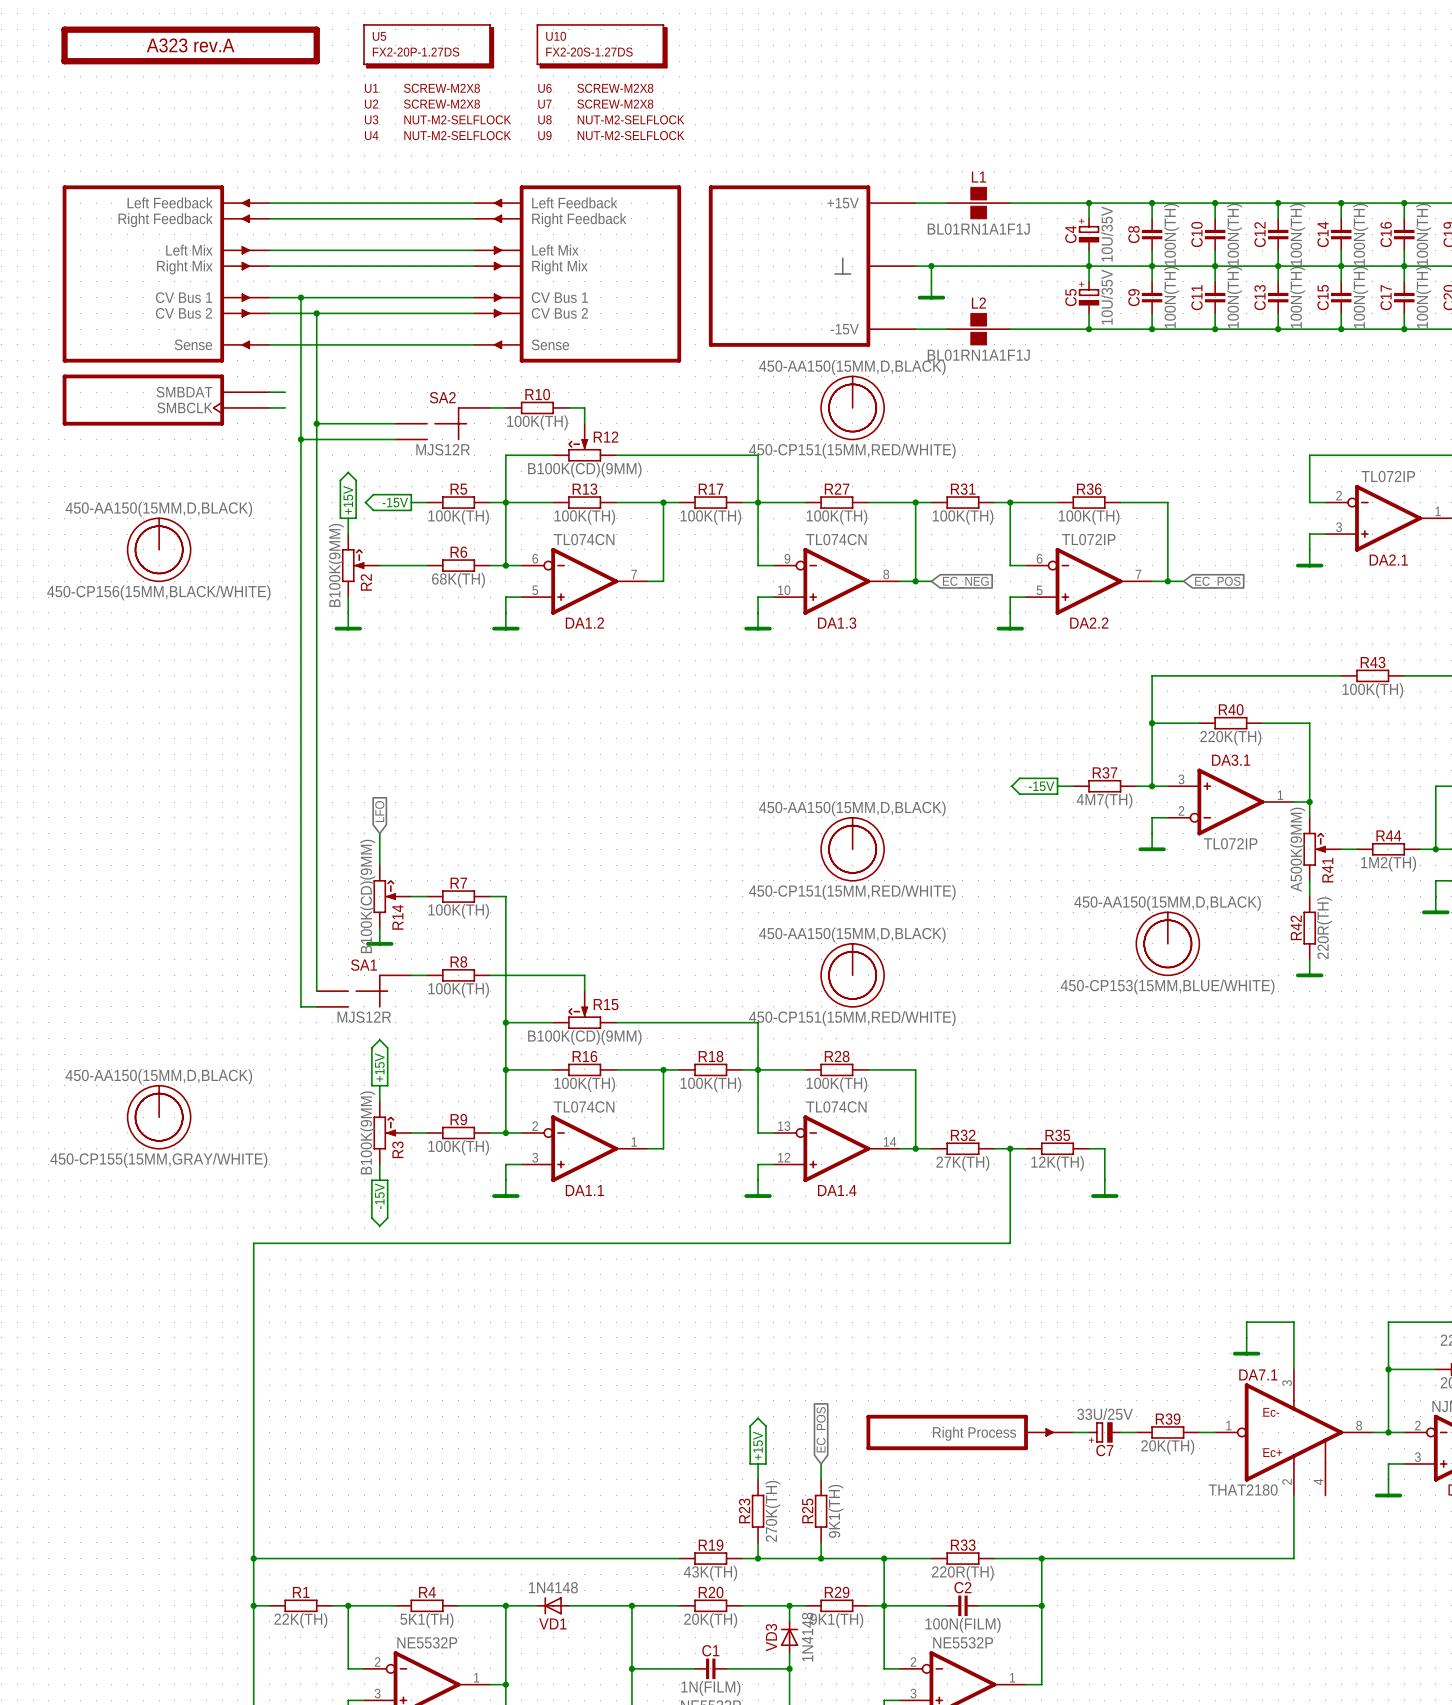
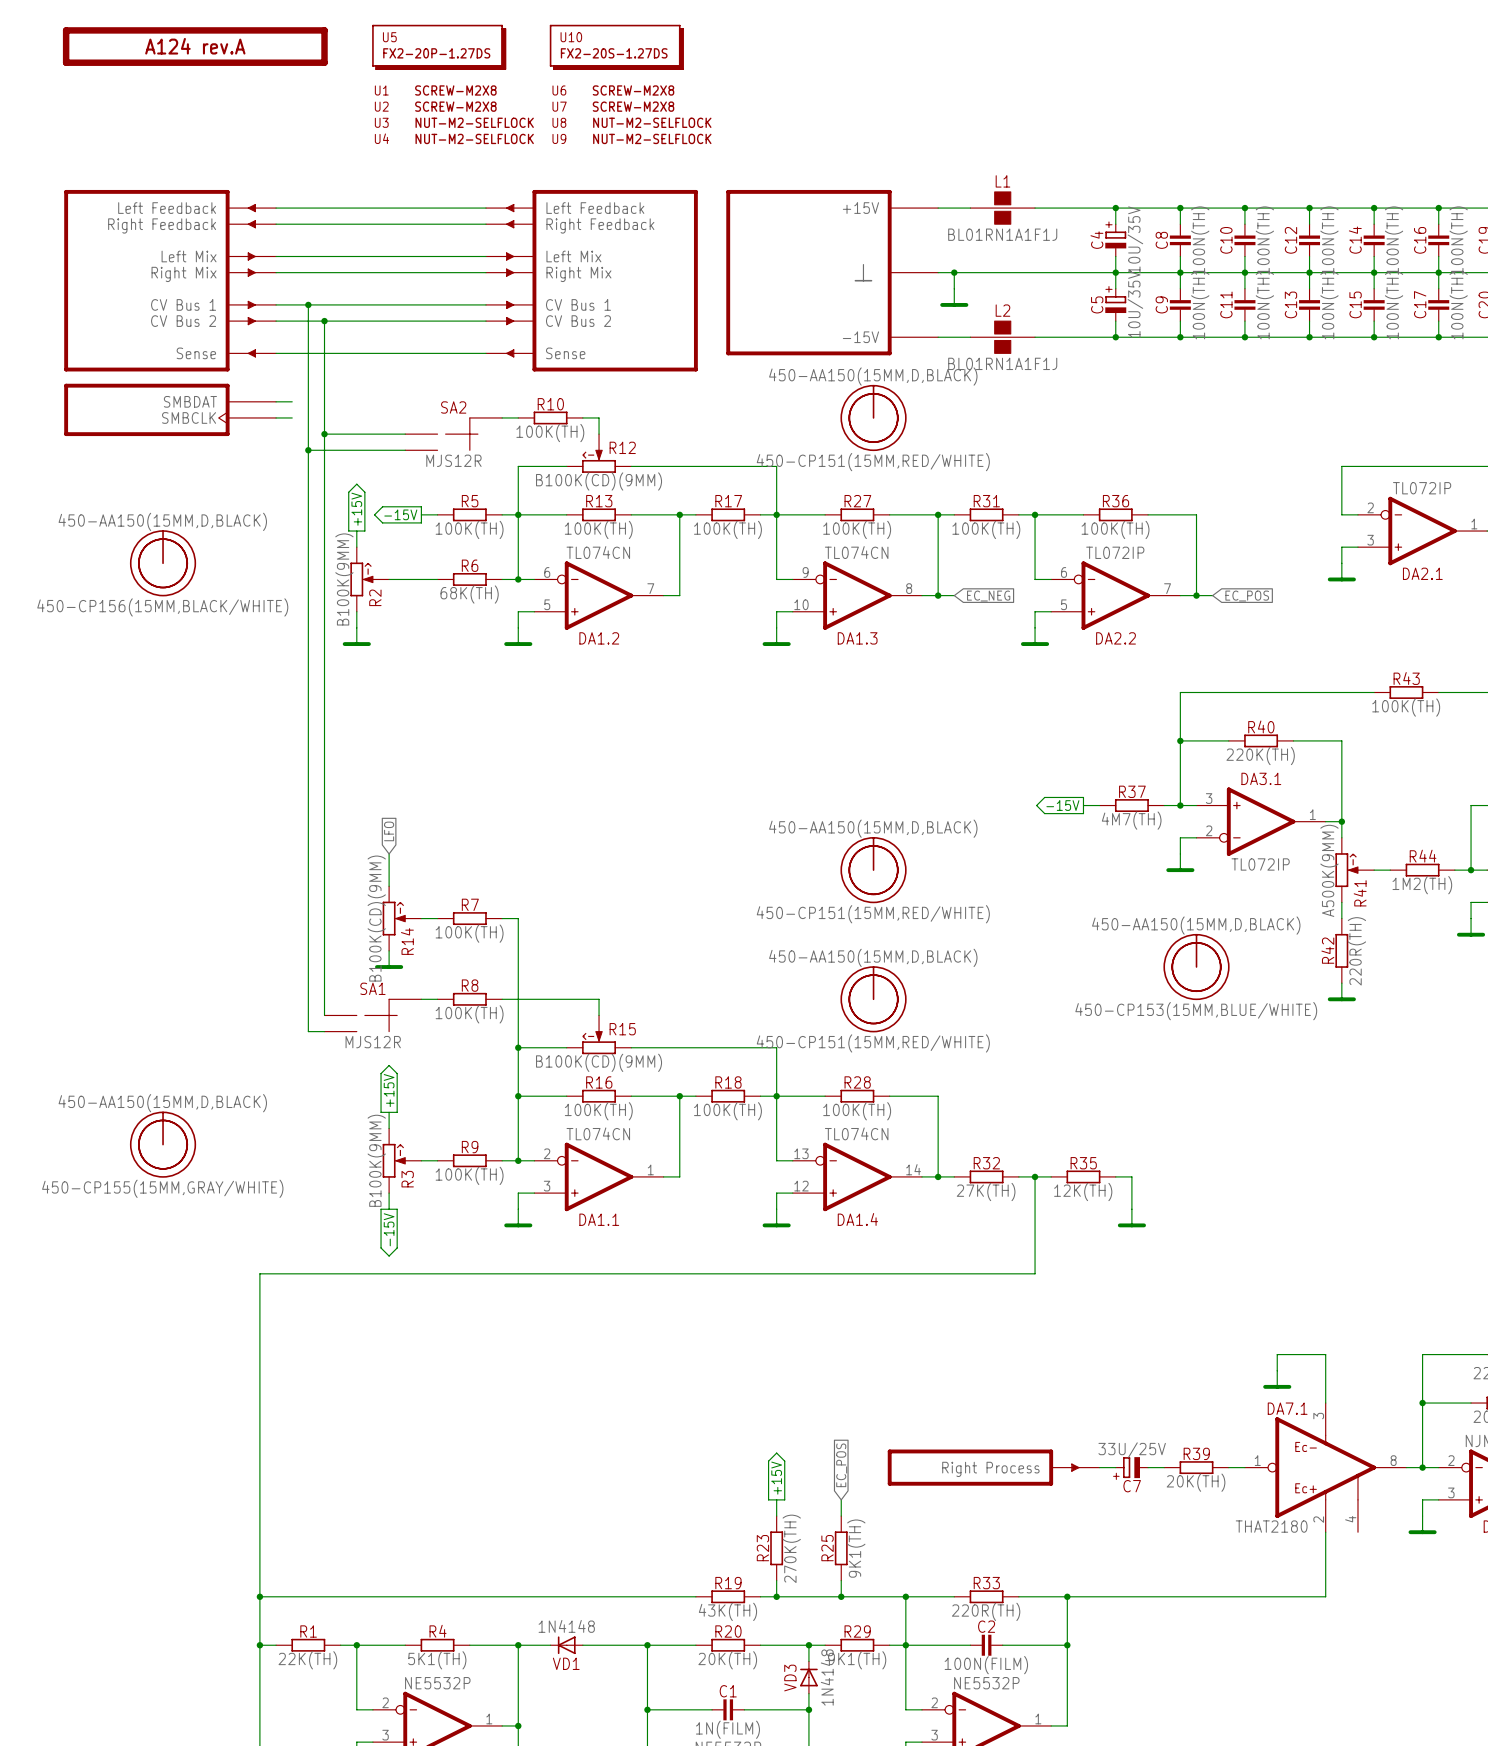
part value: A323 rev.A (190, 45) -> A124 rev.A (195, 46)

